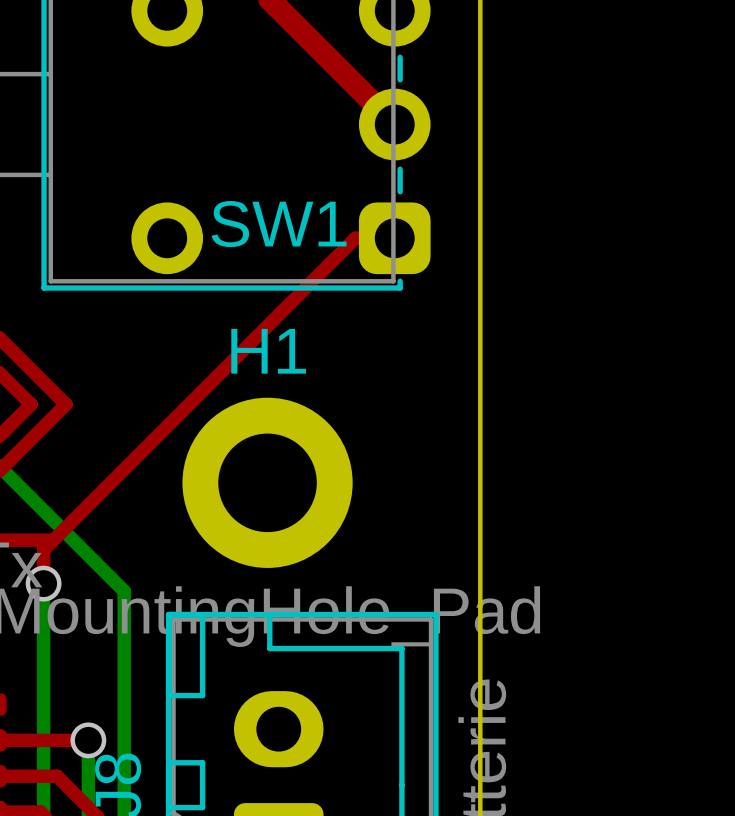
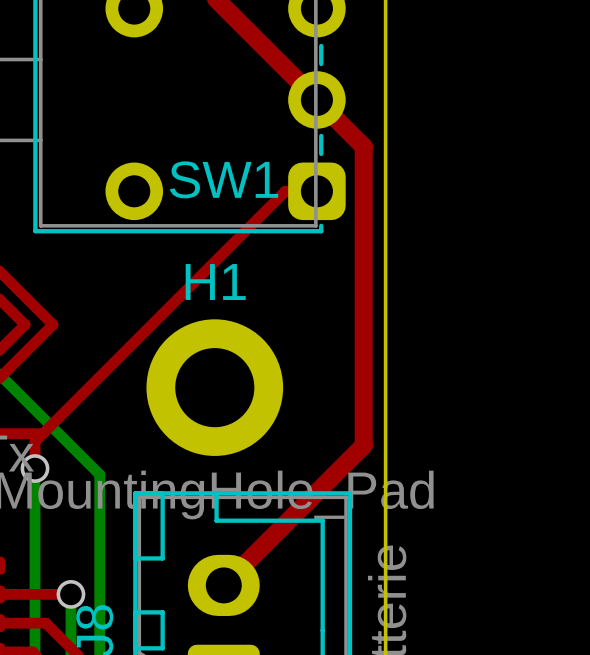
top track: none -> (316, 99) (363, 146) (363, 445) (223, 585)

